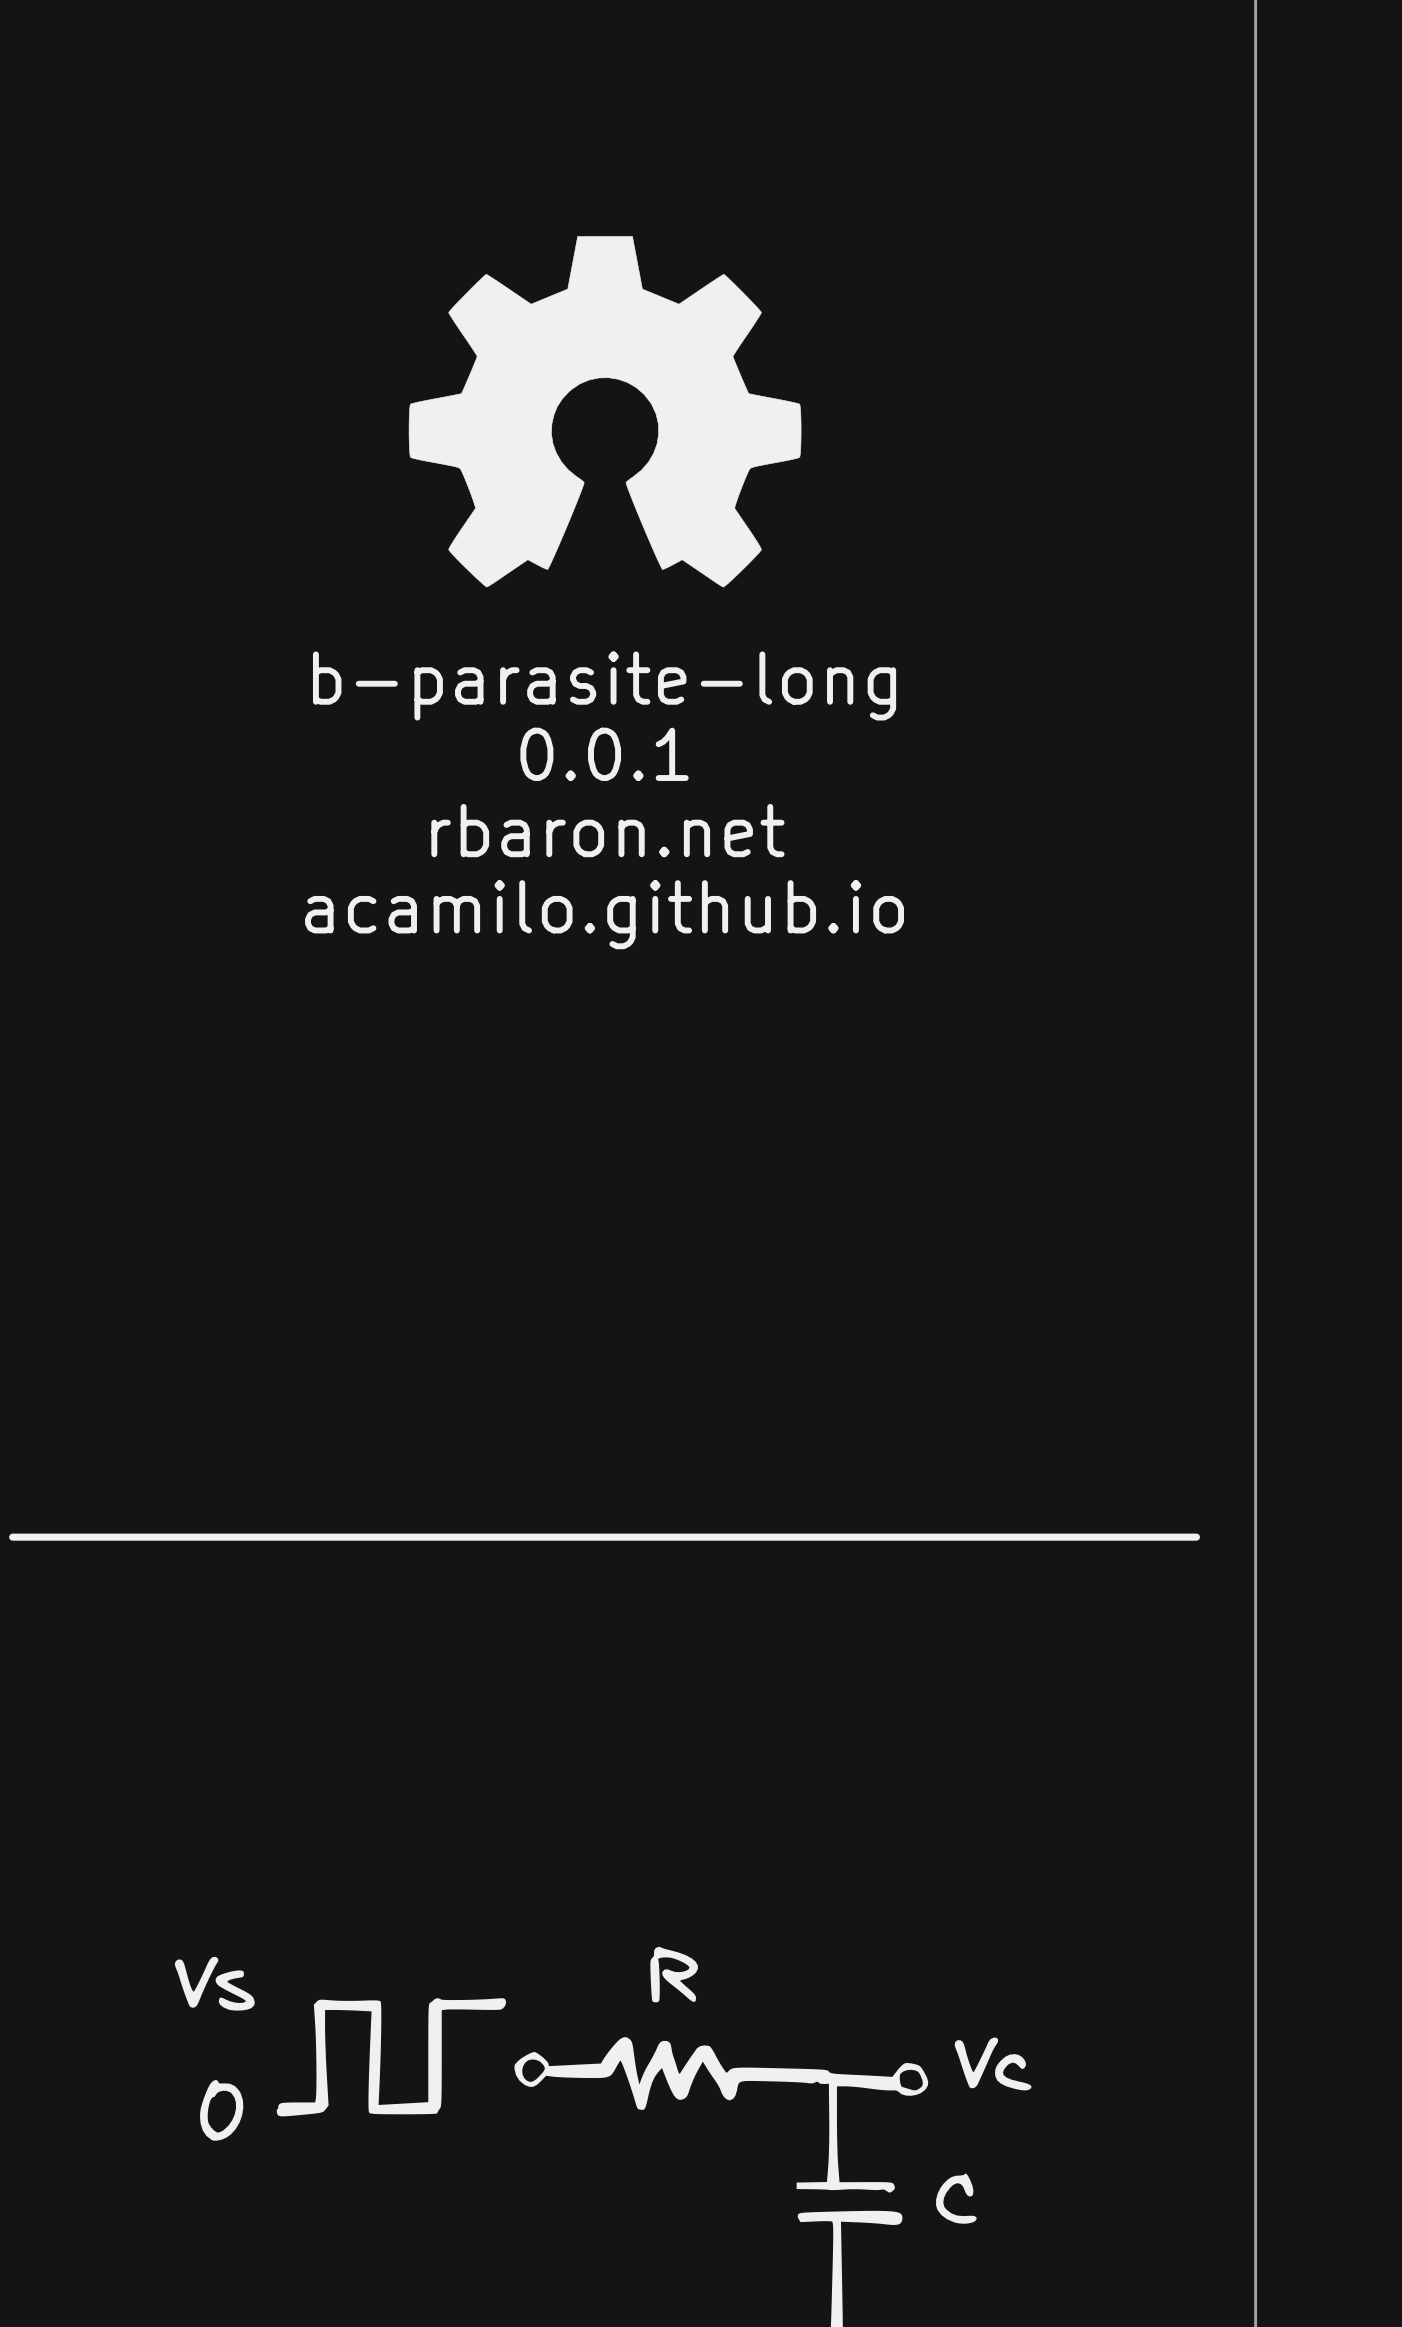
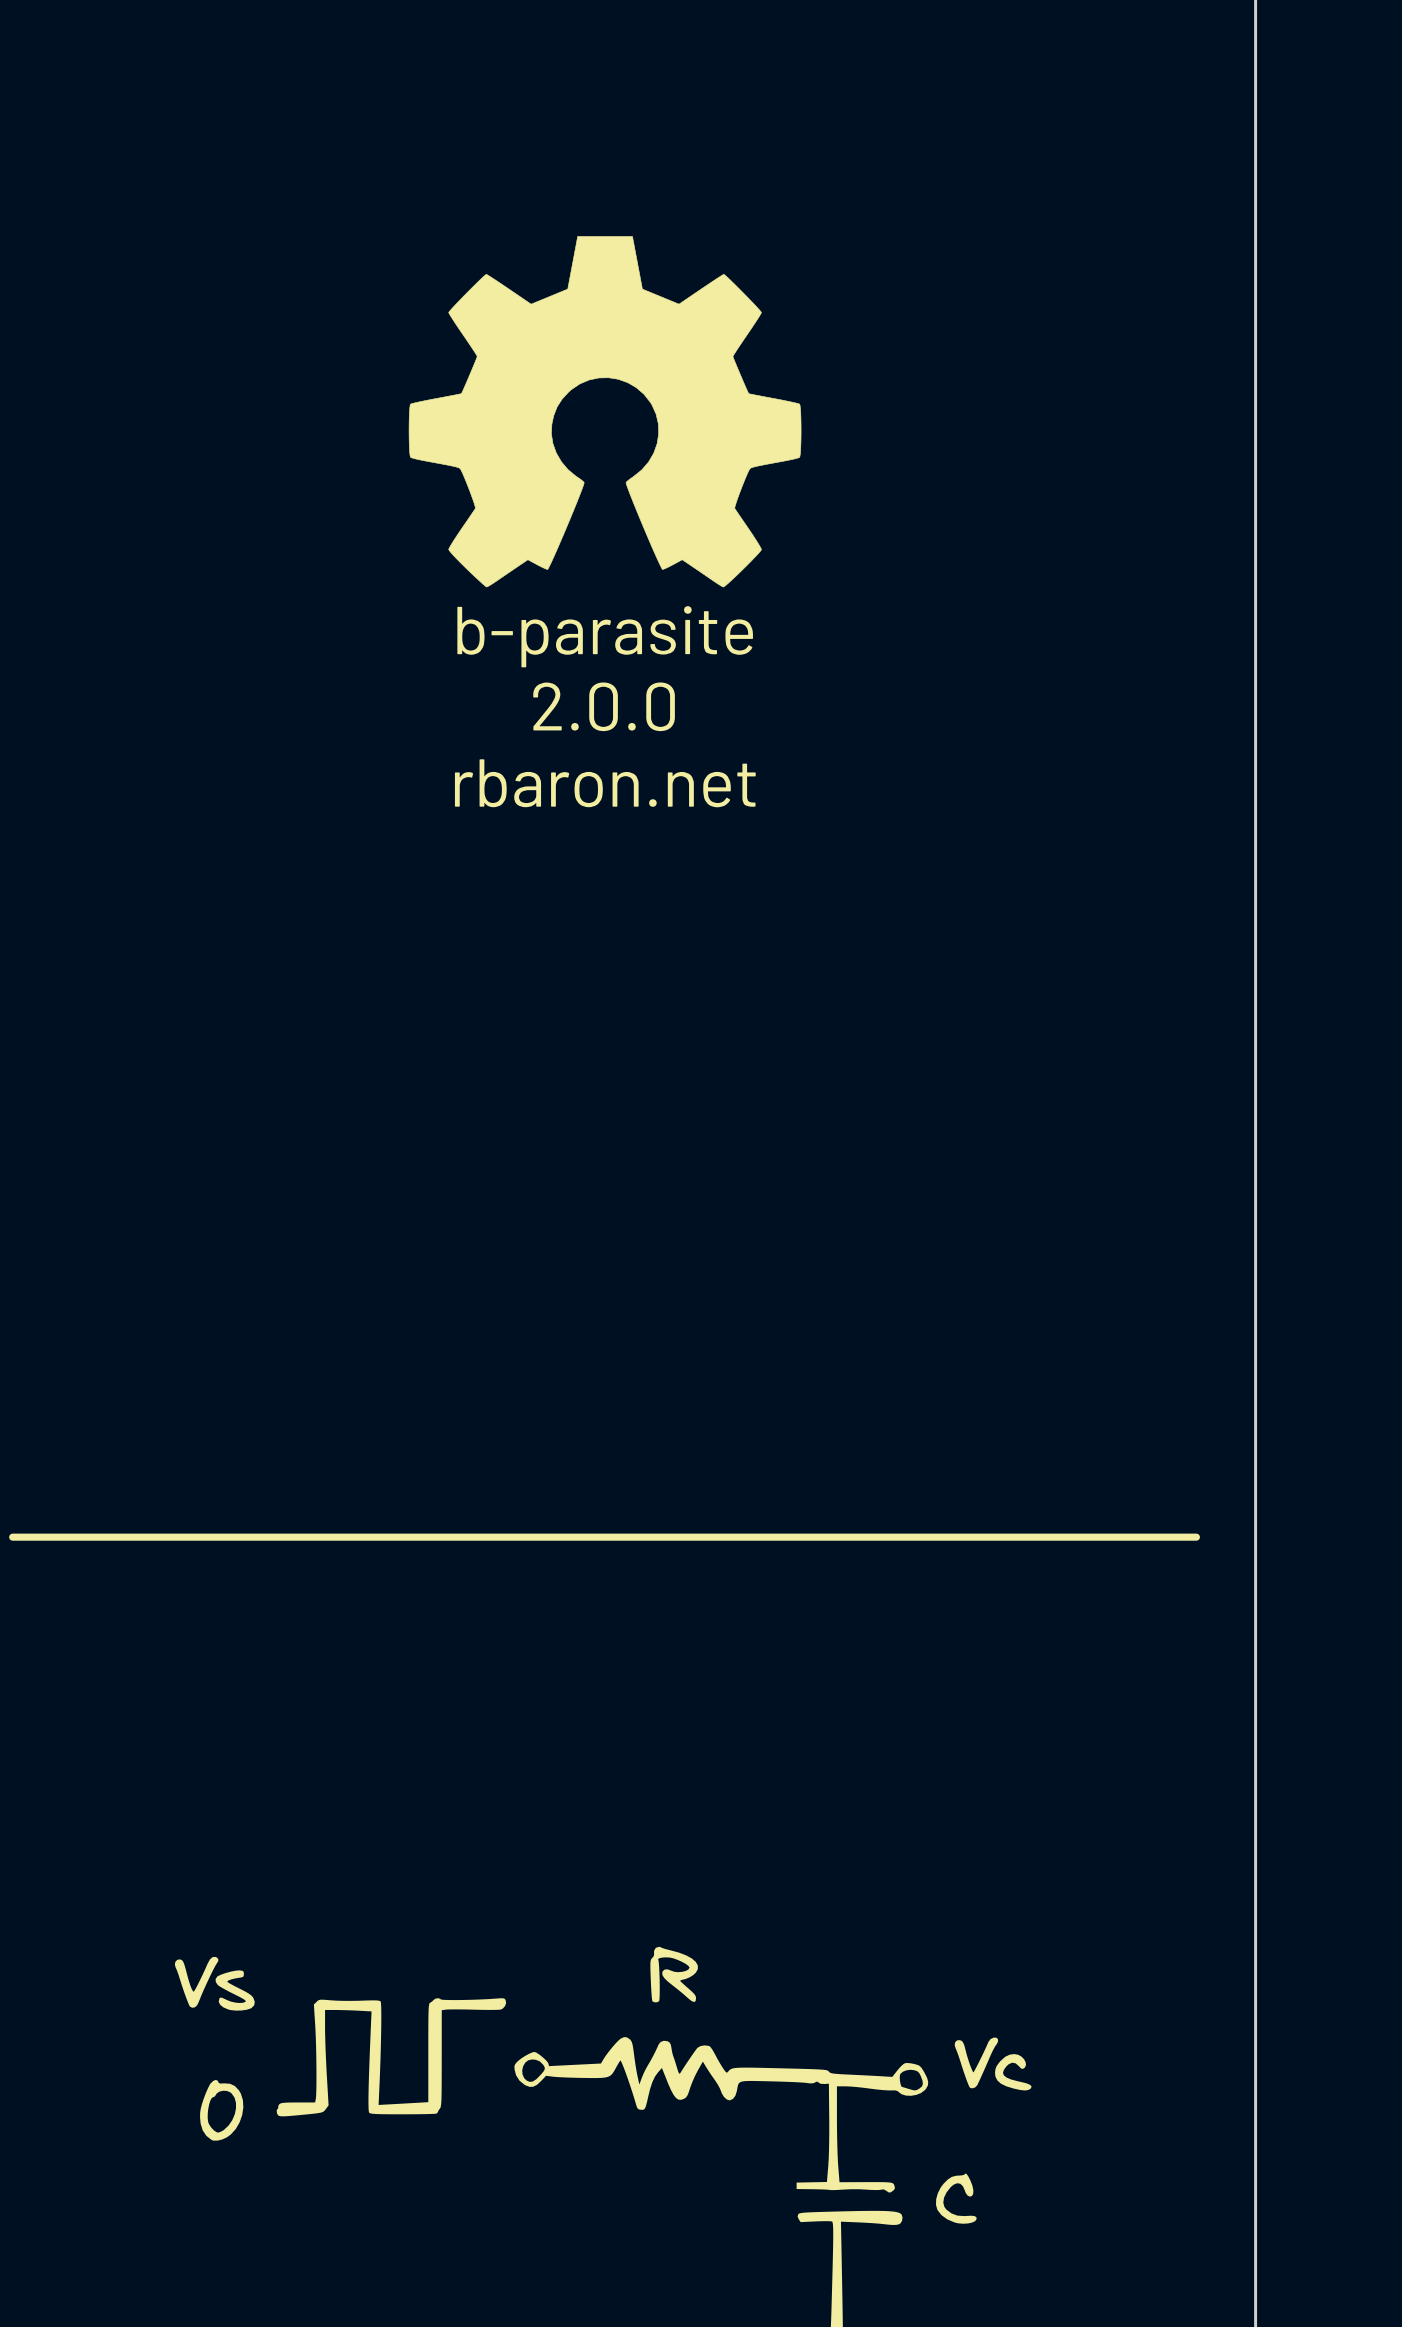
text: b-parasite-long (604, 685) -> b-parasite (605, 636)
text: none -> 2.0.0 (604, 706)
text: 0.0.1 (604, 754) -> none
text position: rbaron.net (607, 830) -> rbaron.net (605, 783)
text: acamilo.github.io (604, 914) -> none

